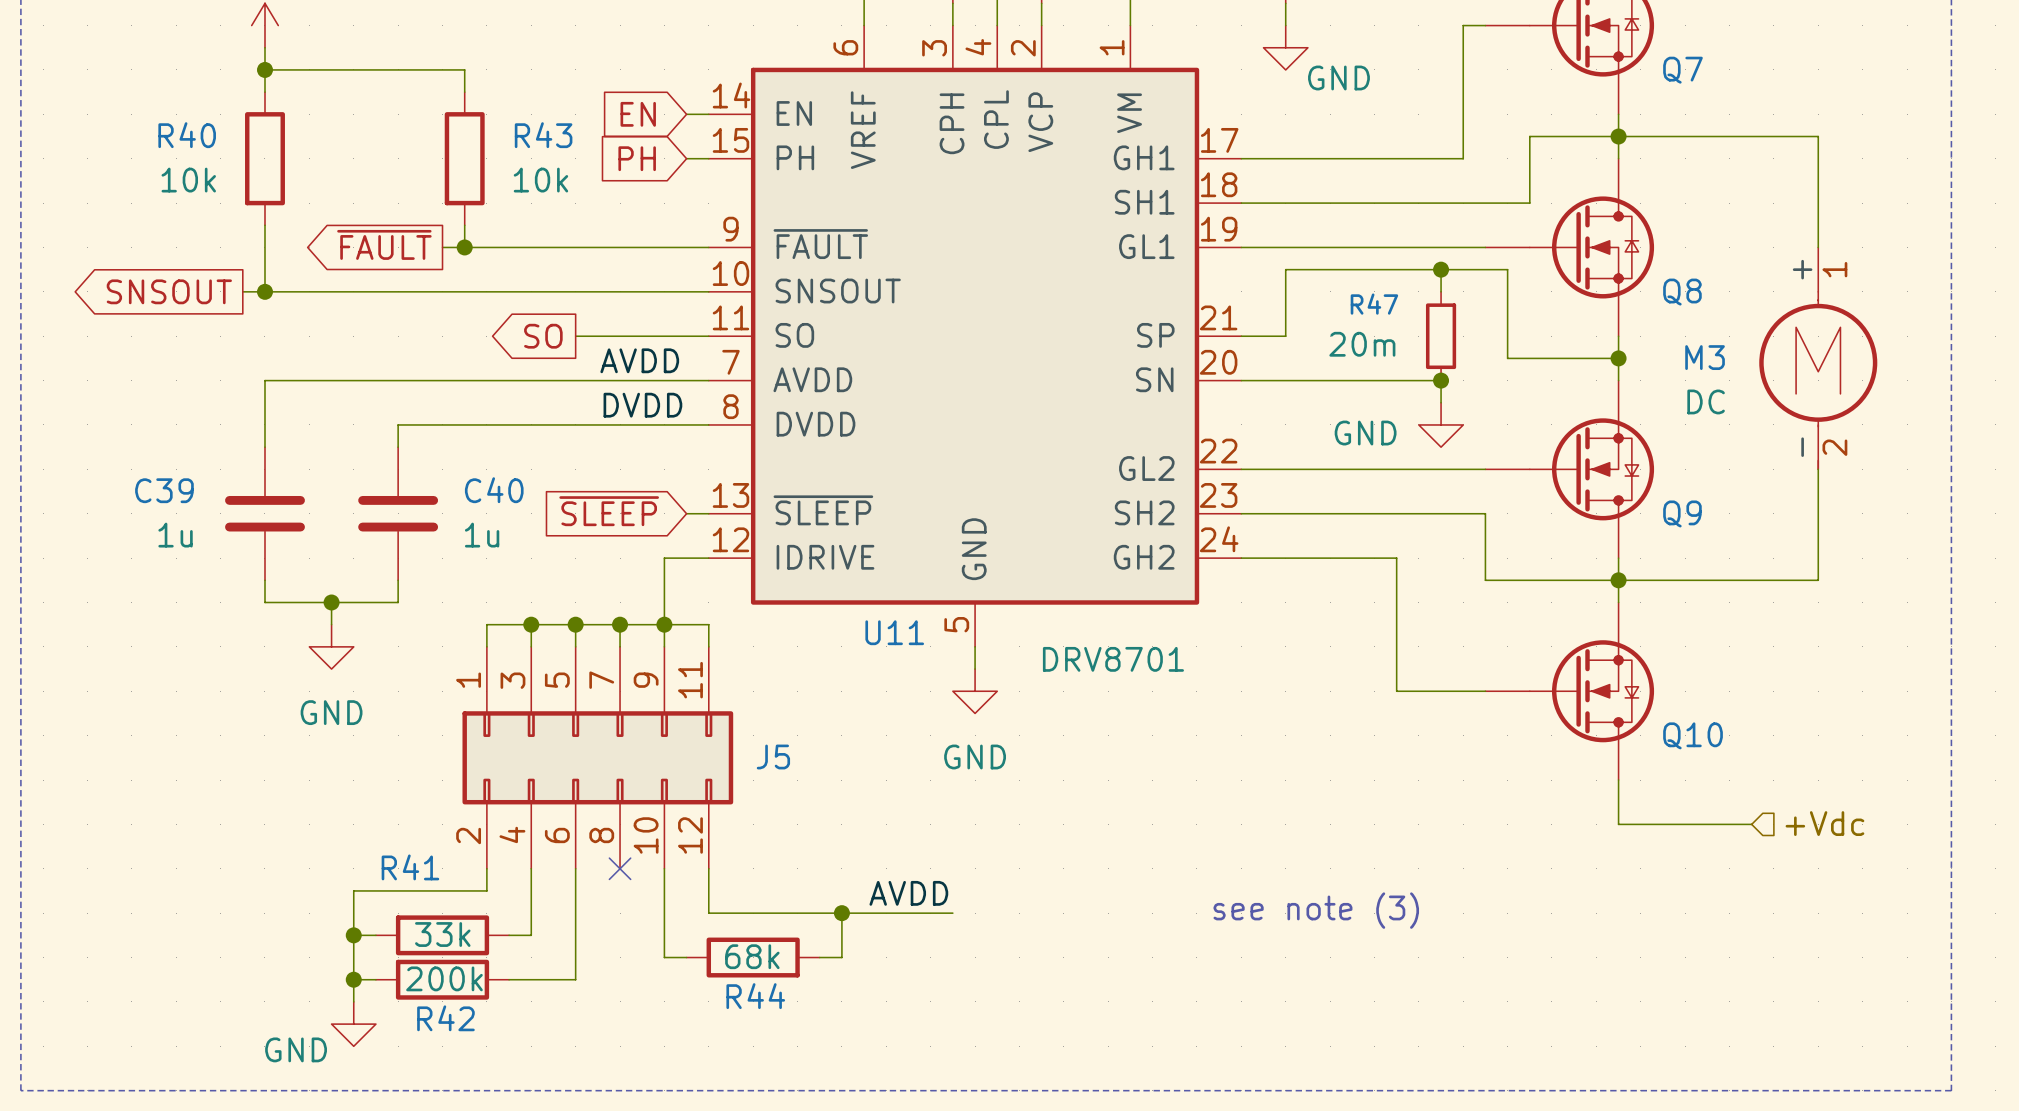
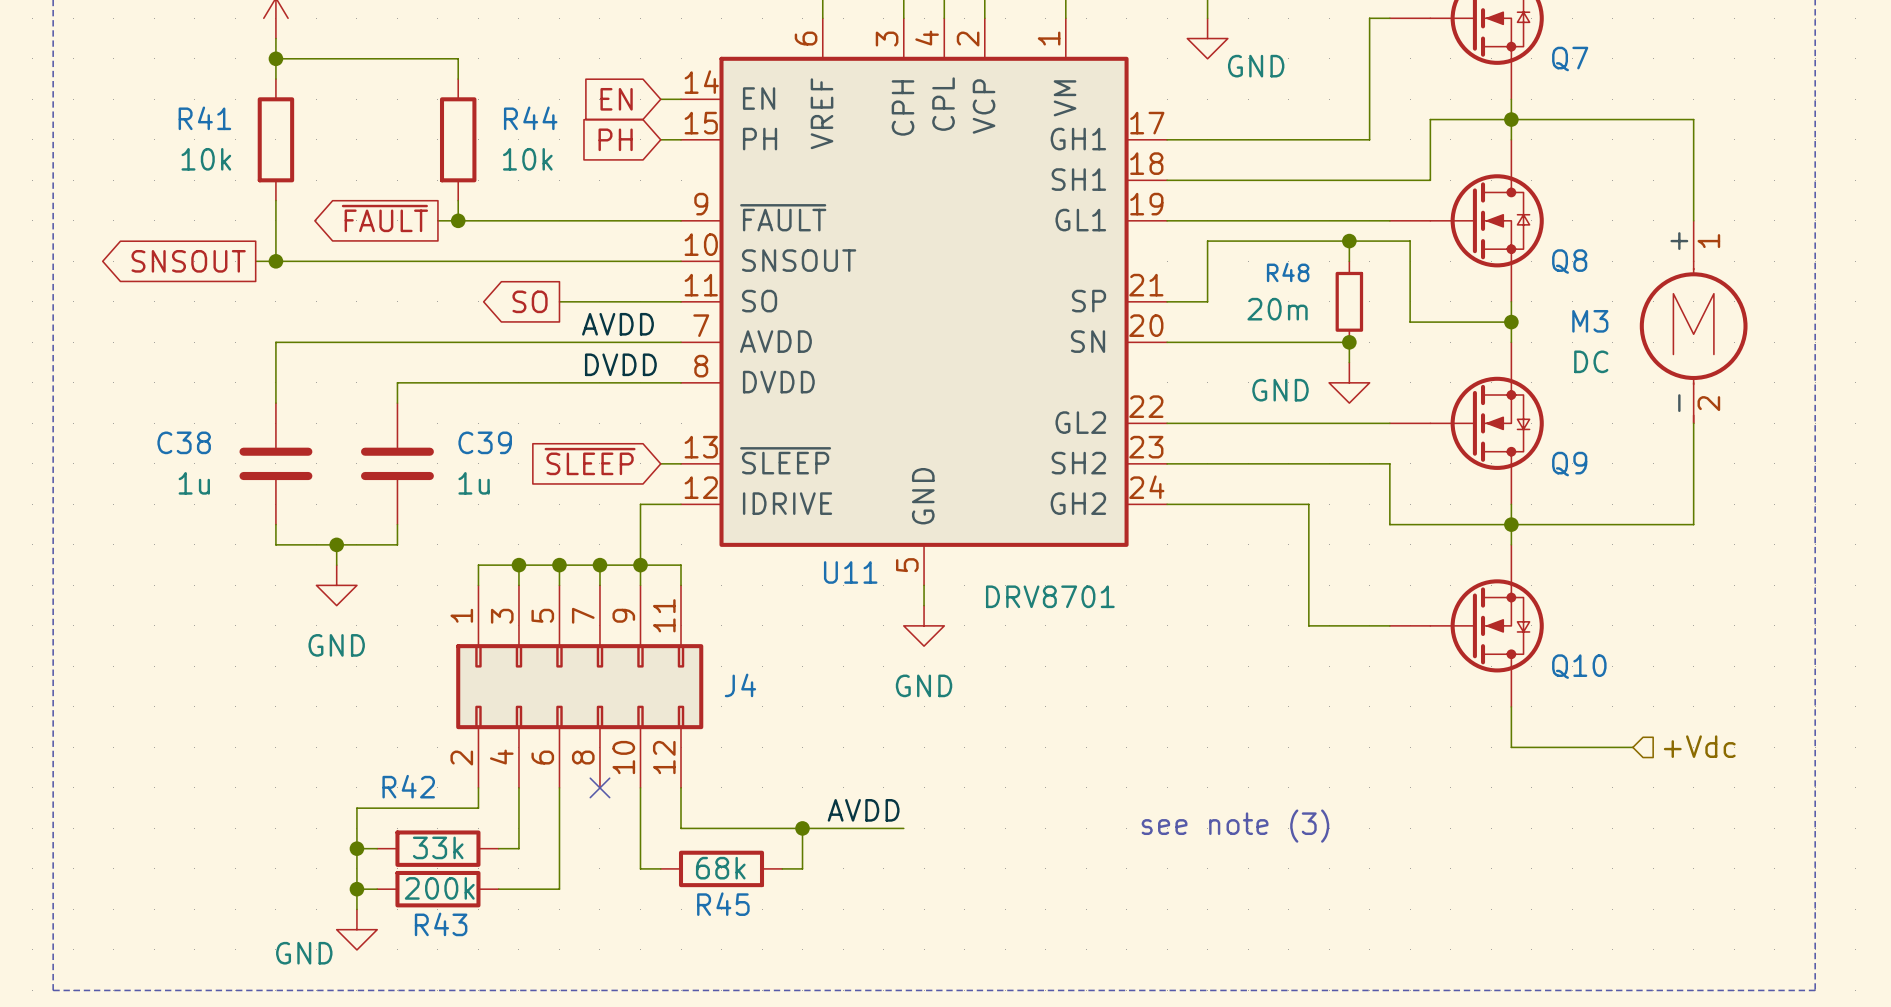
R40 name: R40 (187, 135) -> R41 (204, 118)
R43 name: R43 (543, 135) -> R44 (530, 118)
R47 name: R47 (1374, 304) -> R48 (1288, 272)
C39 name: C39 (164, 490) -> C38 (184, 442)
C40 name: C40 (494, 490) -> C39 (485, 442)
J5 name: J5 (773, 756) -> J4 (740, 685)
R41 name: R41 (410, 867) -> R42 (408, 786)
R44 name: R44 (755, 996) -> R45 (723, 904)
R42 name: R42 (445, 1018) -> R43 (441, 924)

